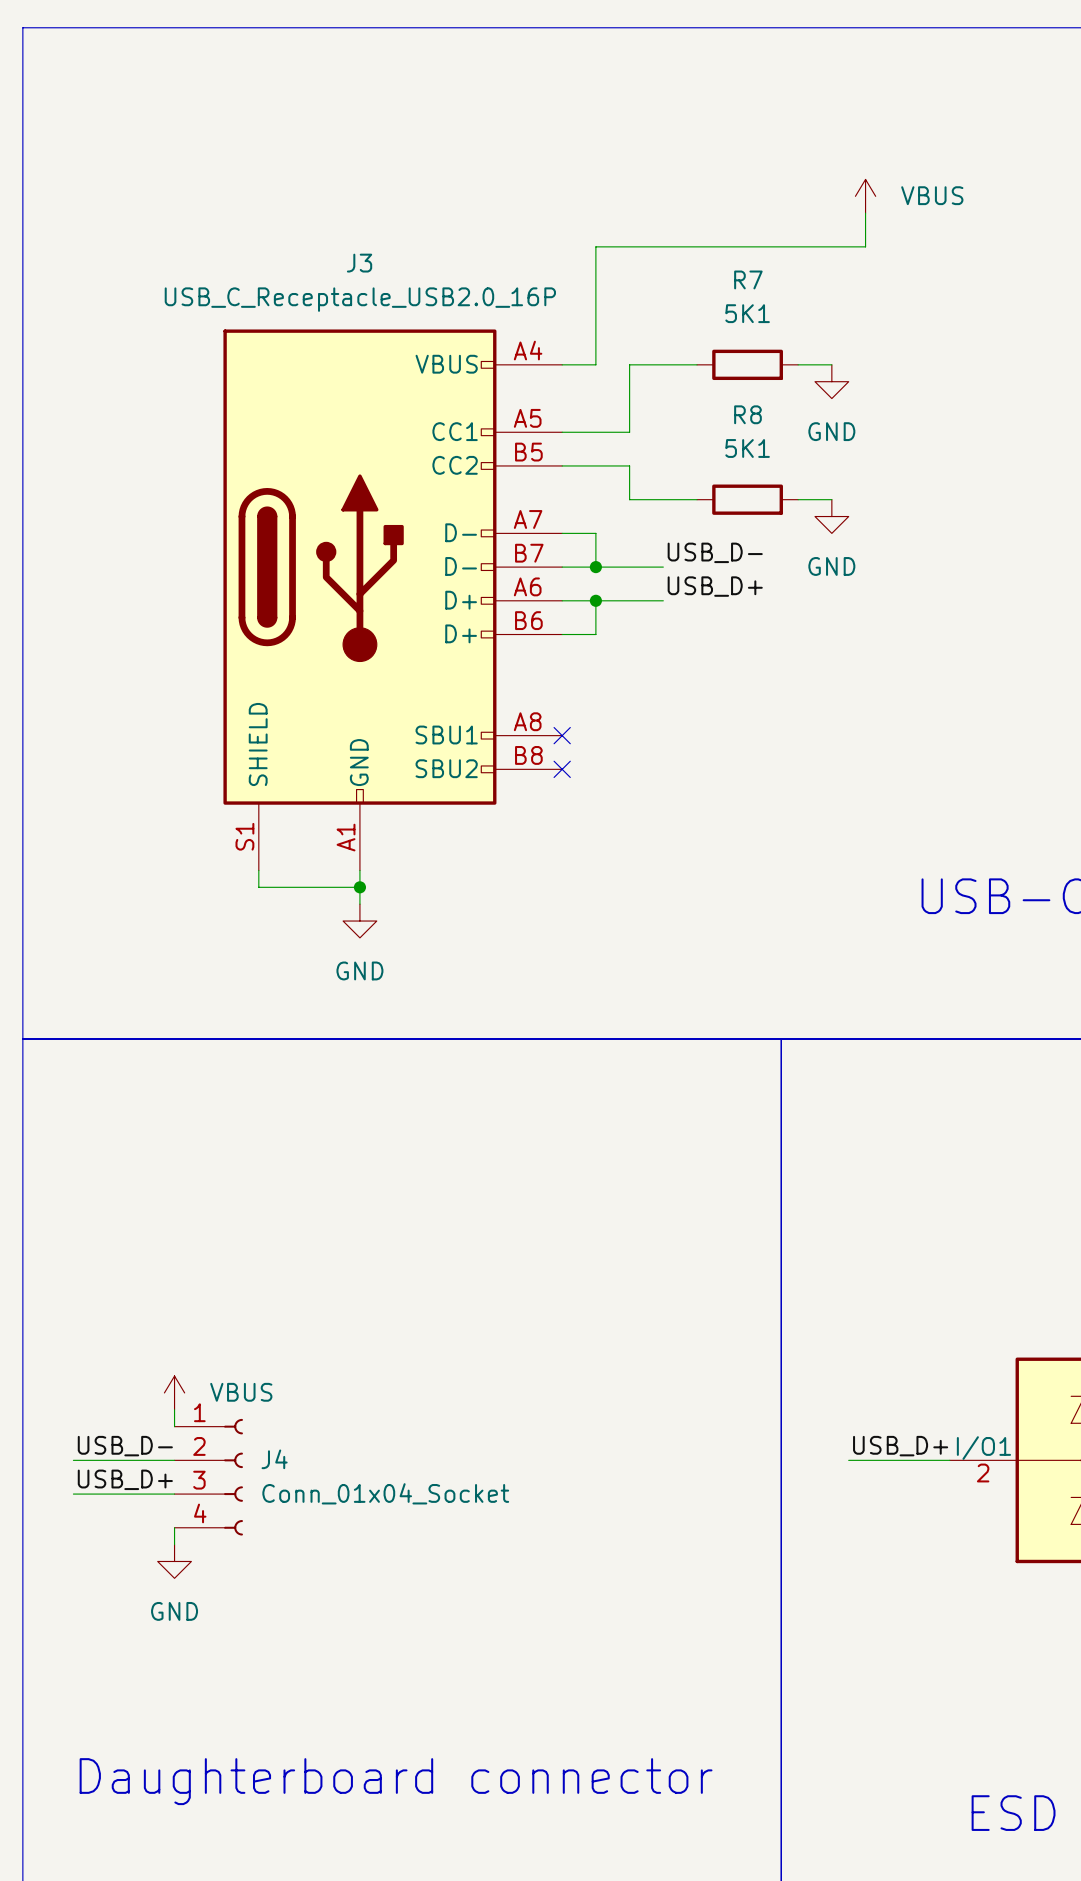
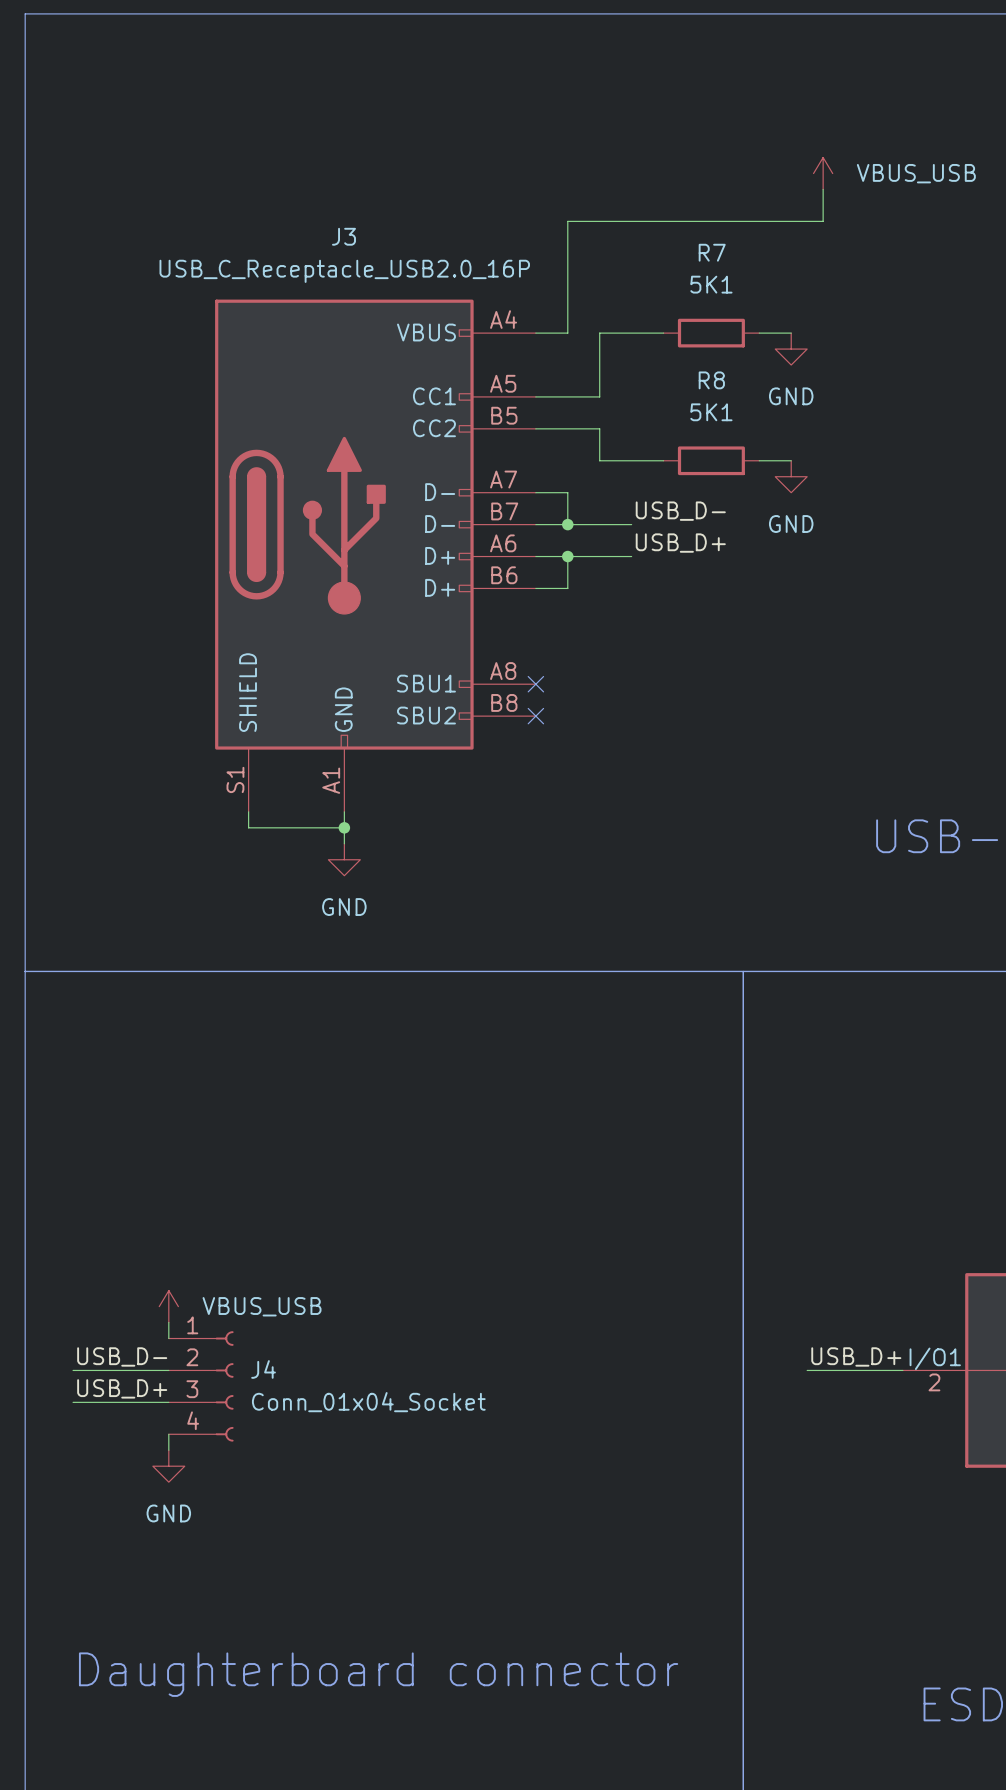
power symbol: VBUS (865, 196) -> VBUS_USB (823, 173)
power symbol: VBUS (174, 1392) -> VBUS_USB (168, 1306)

